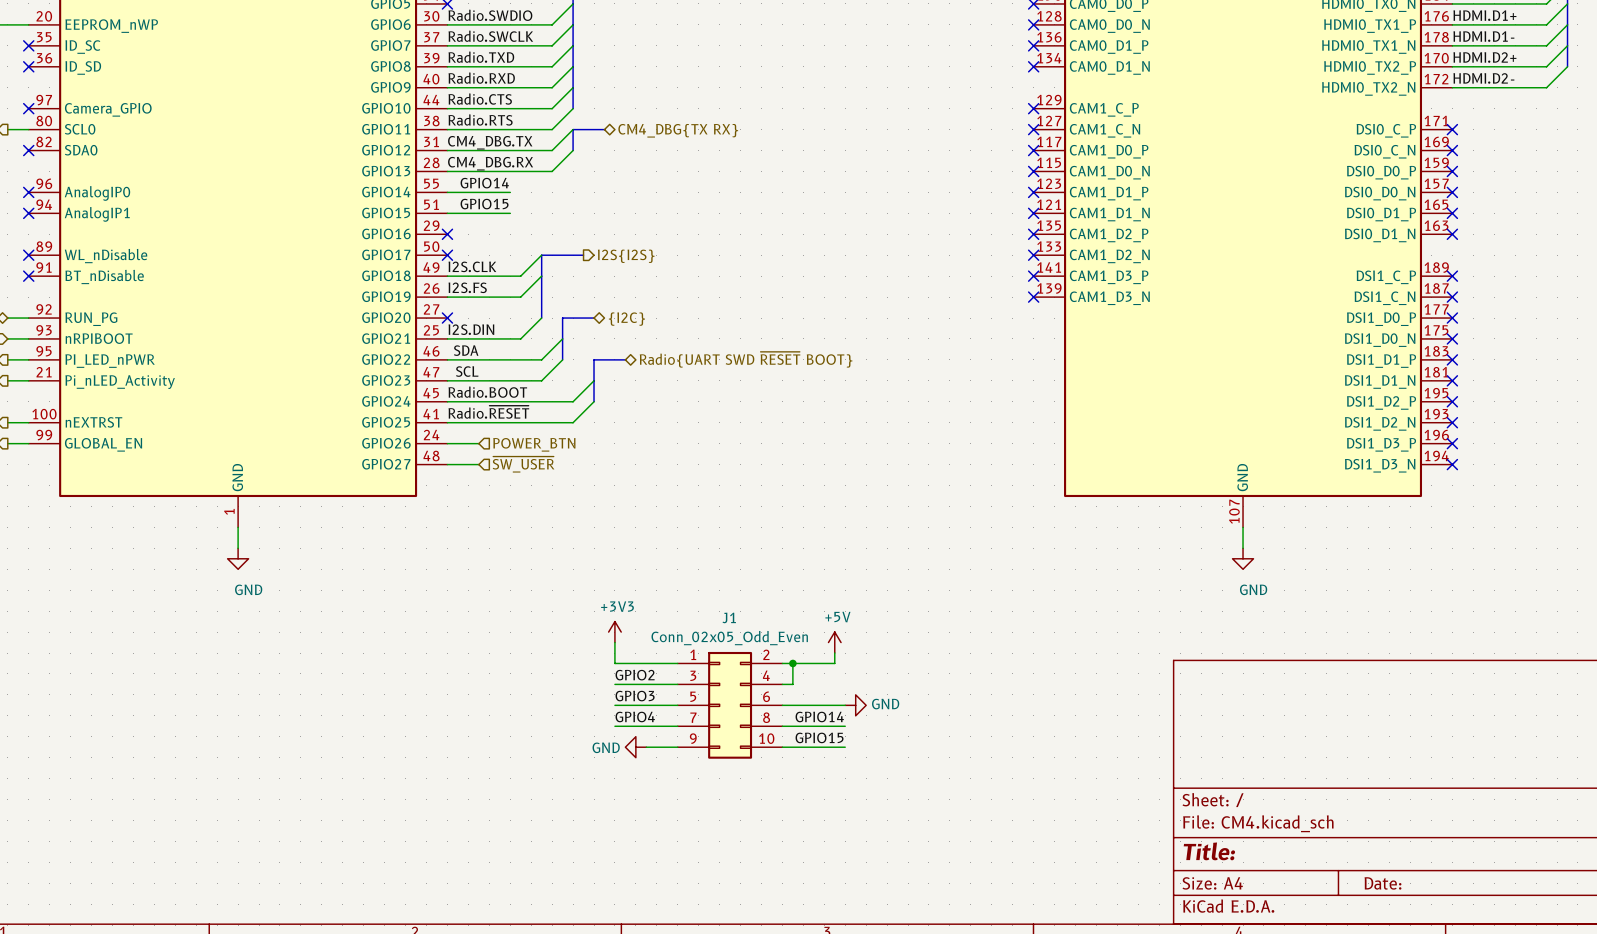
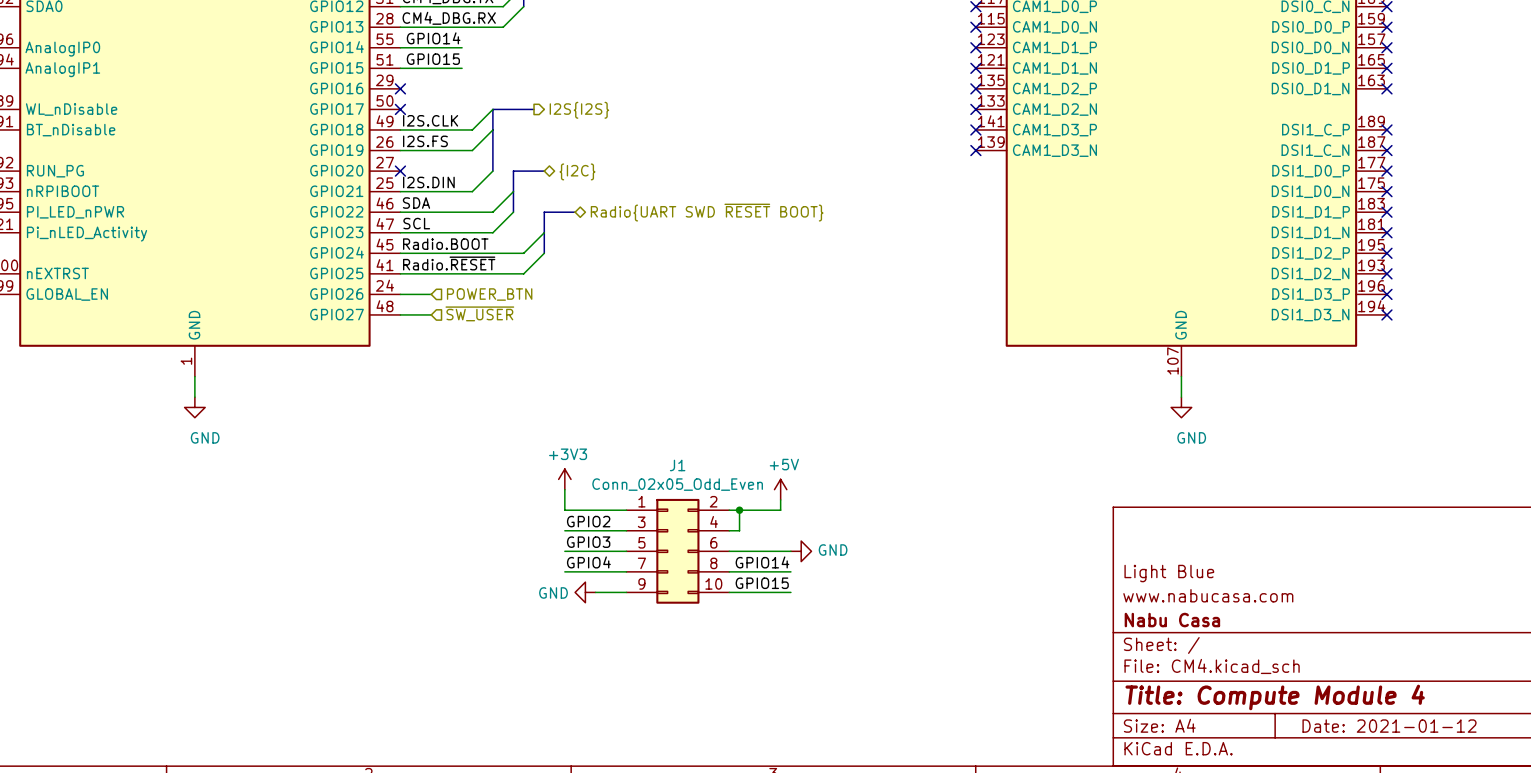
title block: none -> Light Blue (1169, 573)
title block: none -> www.nabucasa.com (1208, 595)
title block: none -> Nabu Casa (1172, 620)
title block: Title: (1209, 851) -> Title: Compute Module 4 (1275, 697)
title block: Date: (1382, 883) -> Date: 2021-01-12 (1389, 726)

